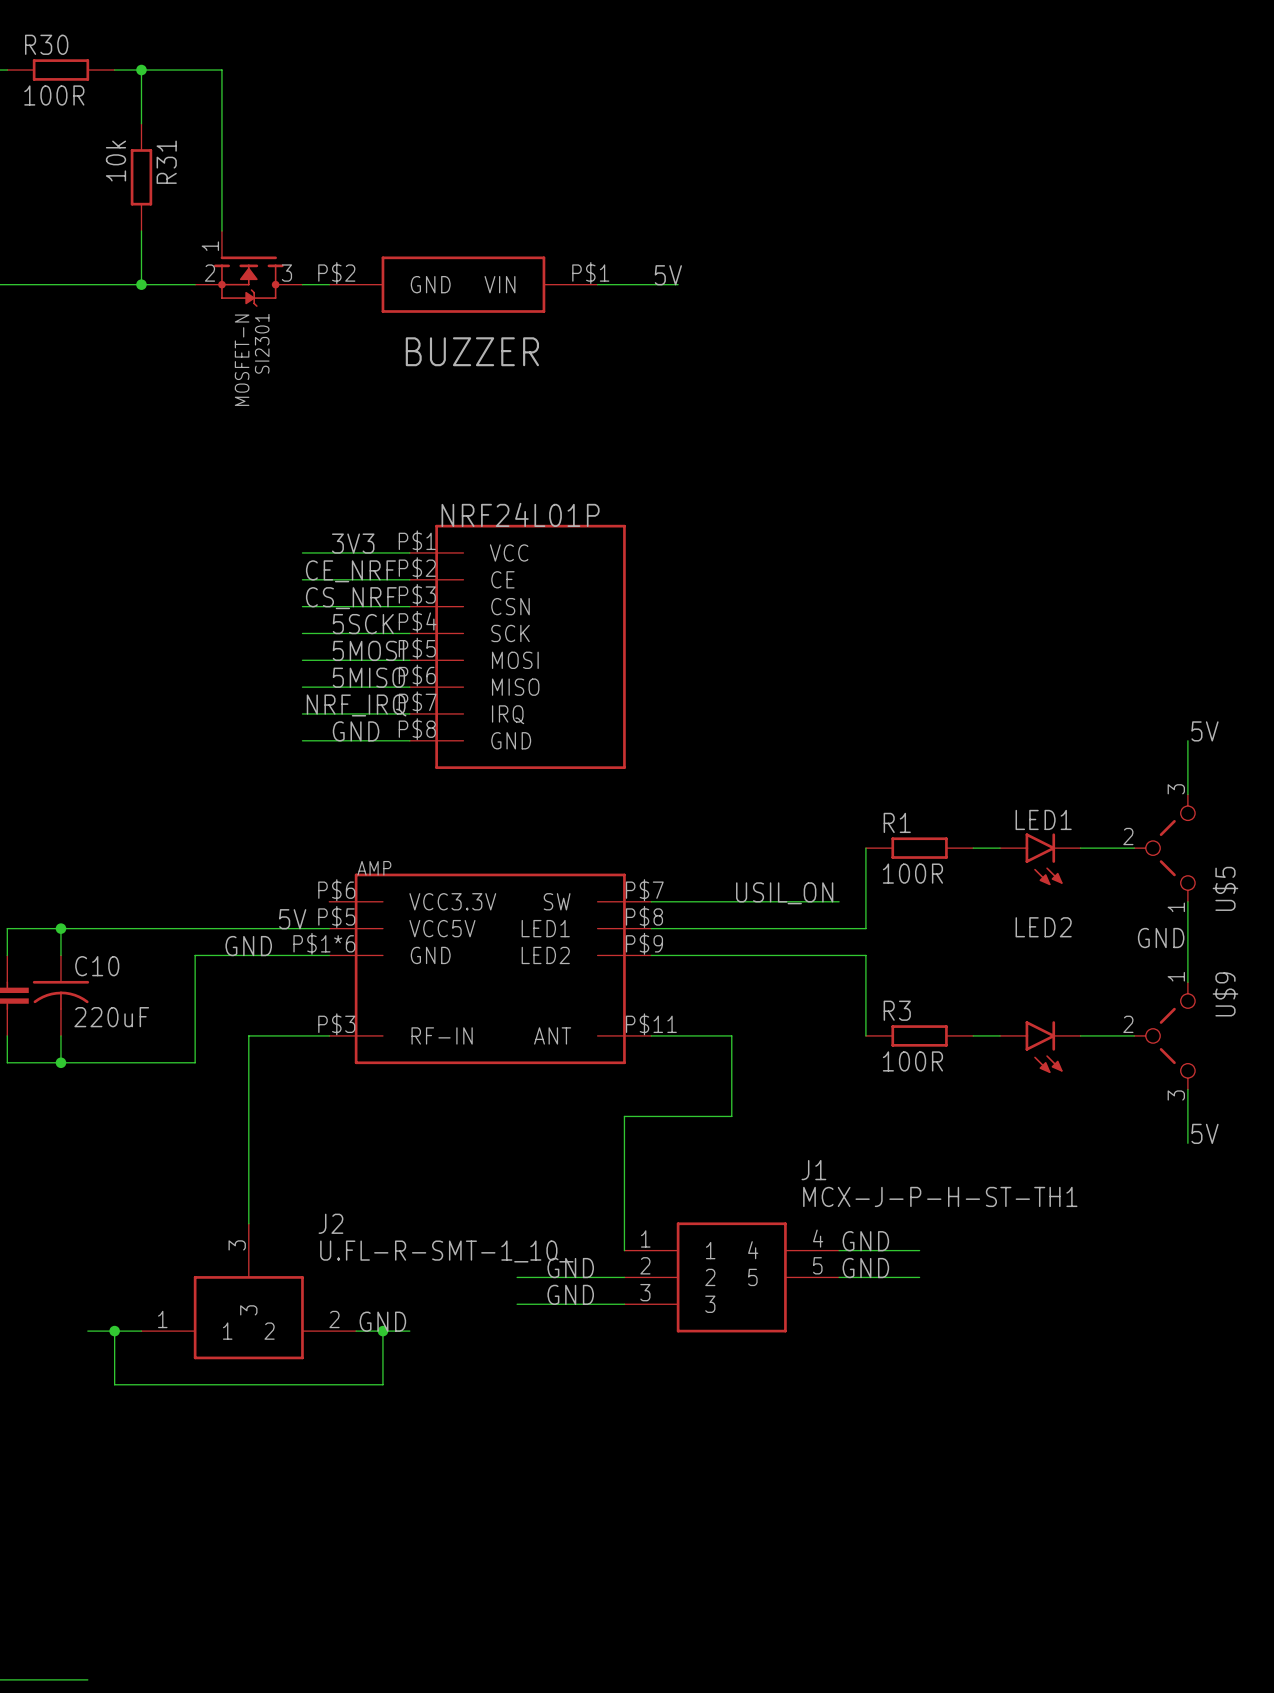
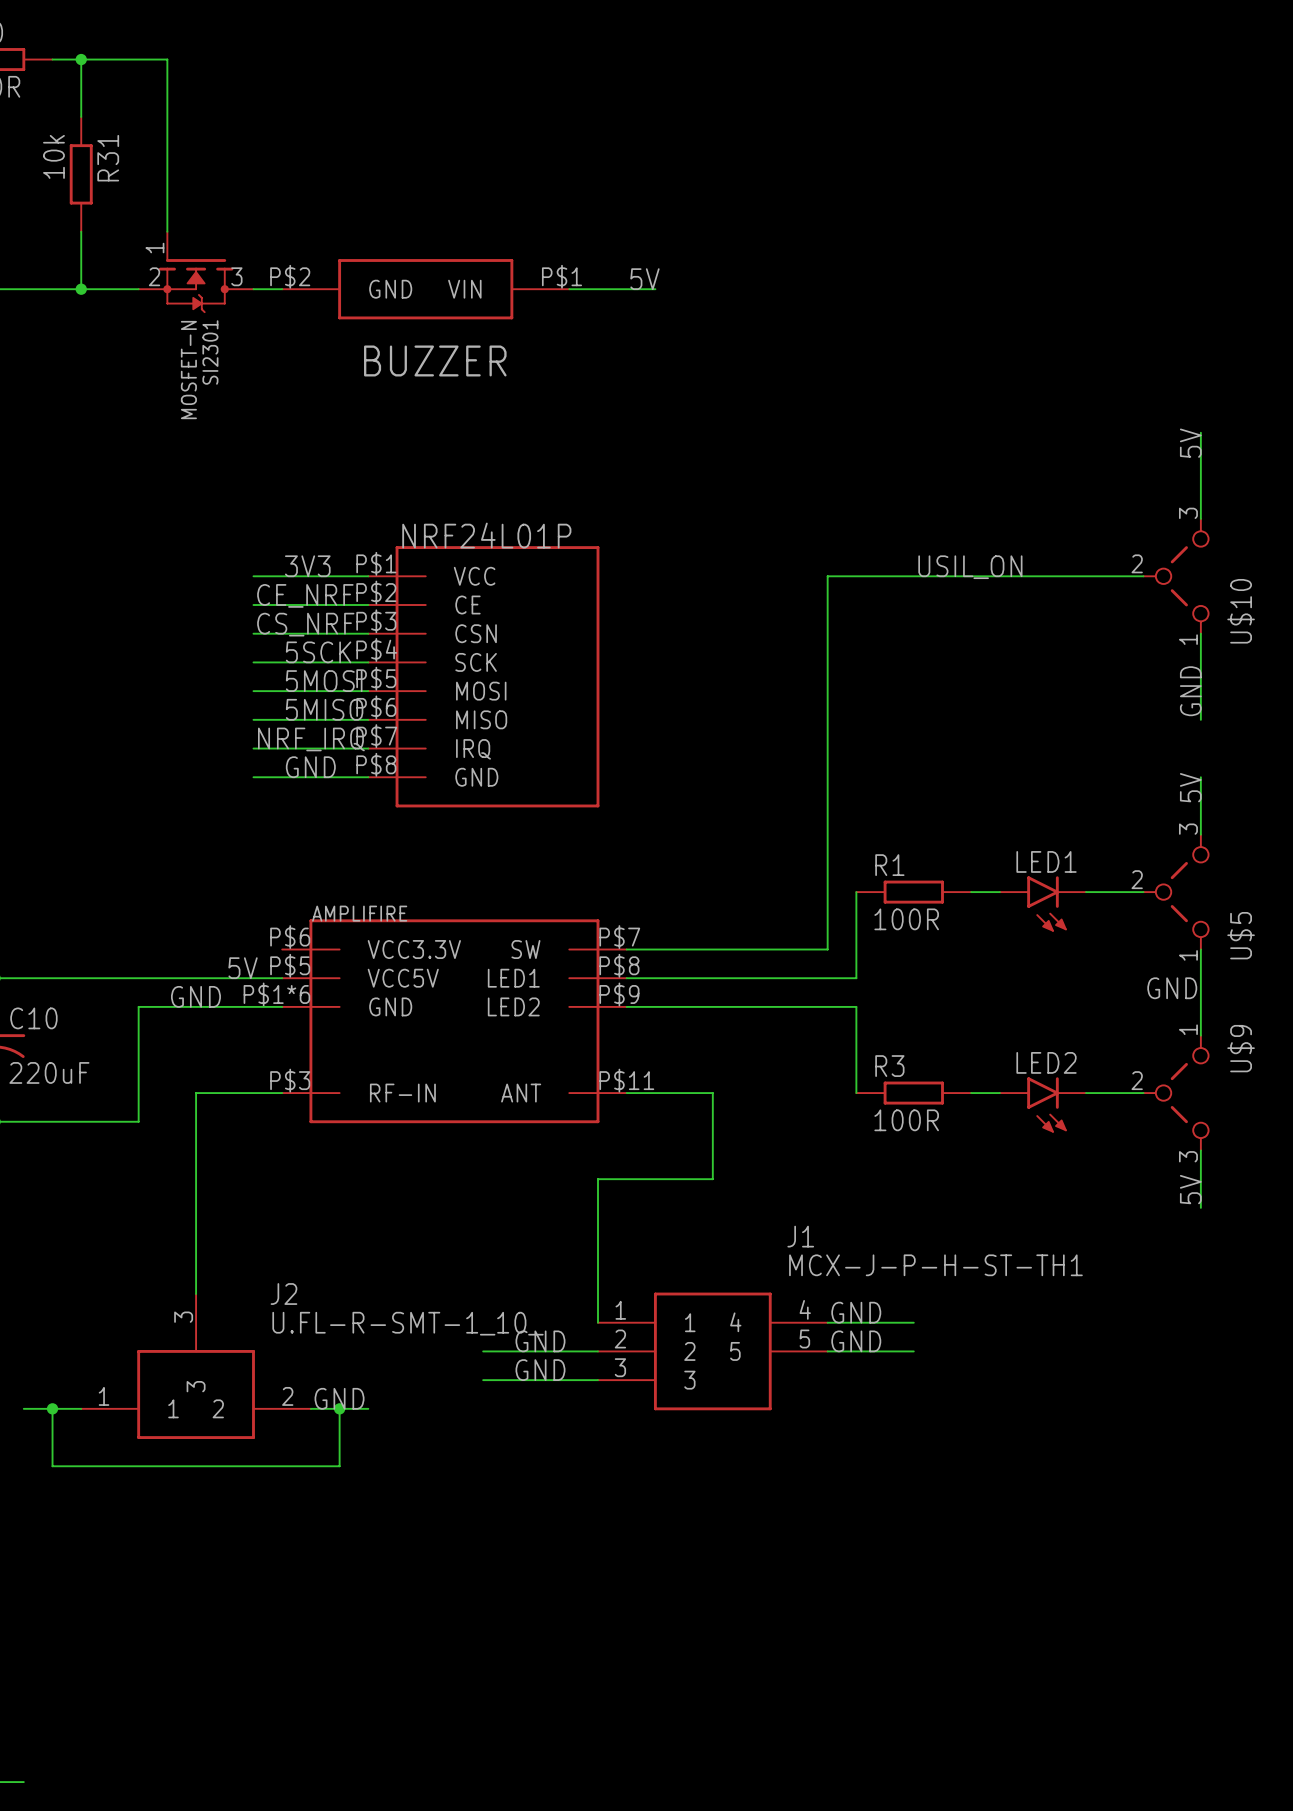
wire: none -> (1200, 432) (1200, 518)
label: none -> 5V (1190, 443)
label: none -> USIL_ON (970, 567)
wire: none -> (1143, 576) (827, 576) (827, 949)
U$10: none -> (1176, 576)
wire: none -> (1200, 633) (1200, 719)
label: none -> GND (1190, 691)
label rotation: 0° (1204, 731) -> 90° counterclockwise (1190, 787)
AMP name: AMP (374, 868) -> AMPLIFIRE (359, 913)
label: USIL_ON (784, 893) -> none
LED2 name position: LED2 (1043, 927) -> LED2 (1046, 1062)
label rotation: 0° (1204, 1133) -> 90° counterclockwise (1190, 1189)

